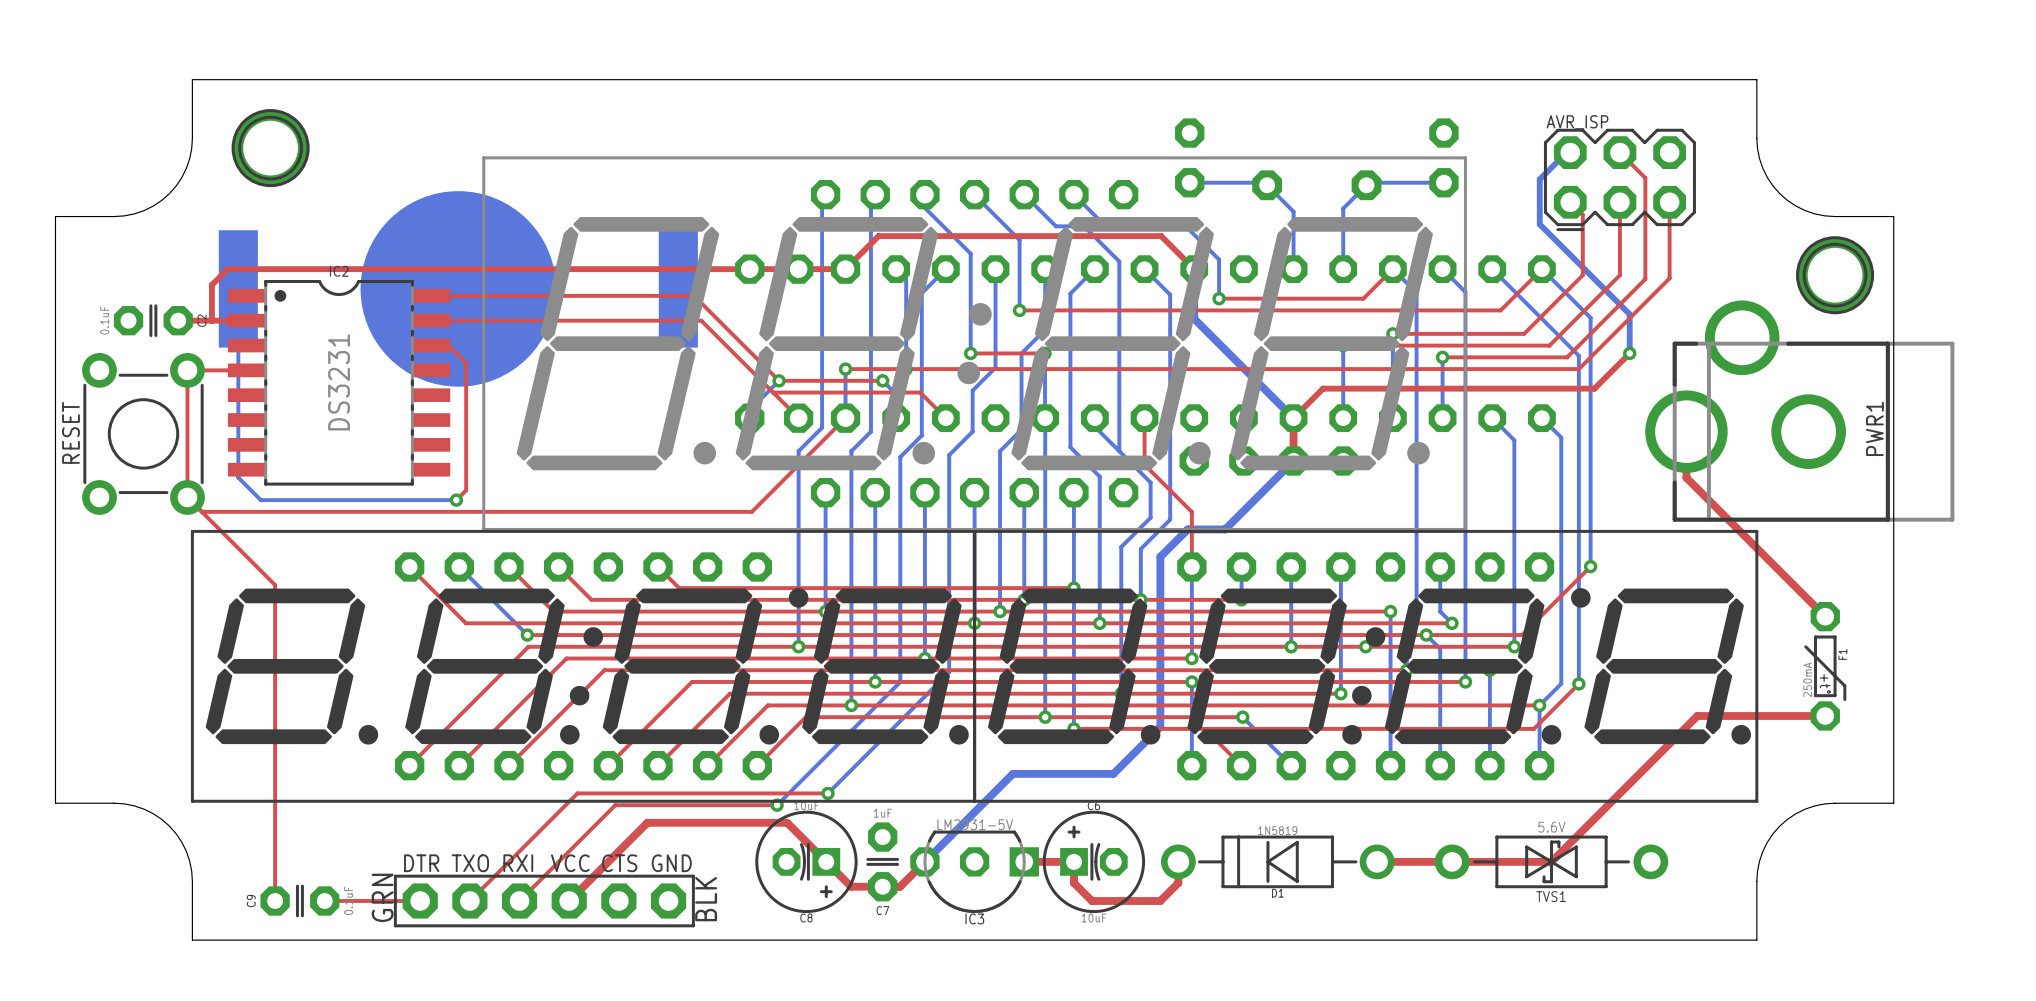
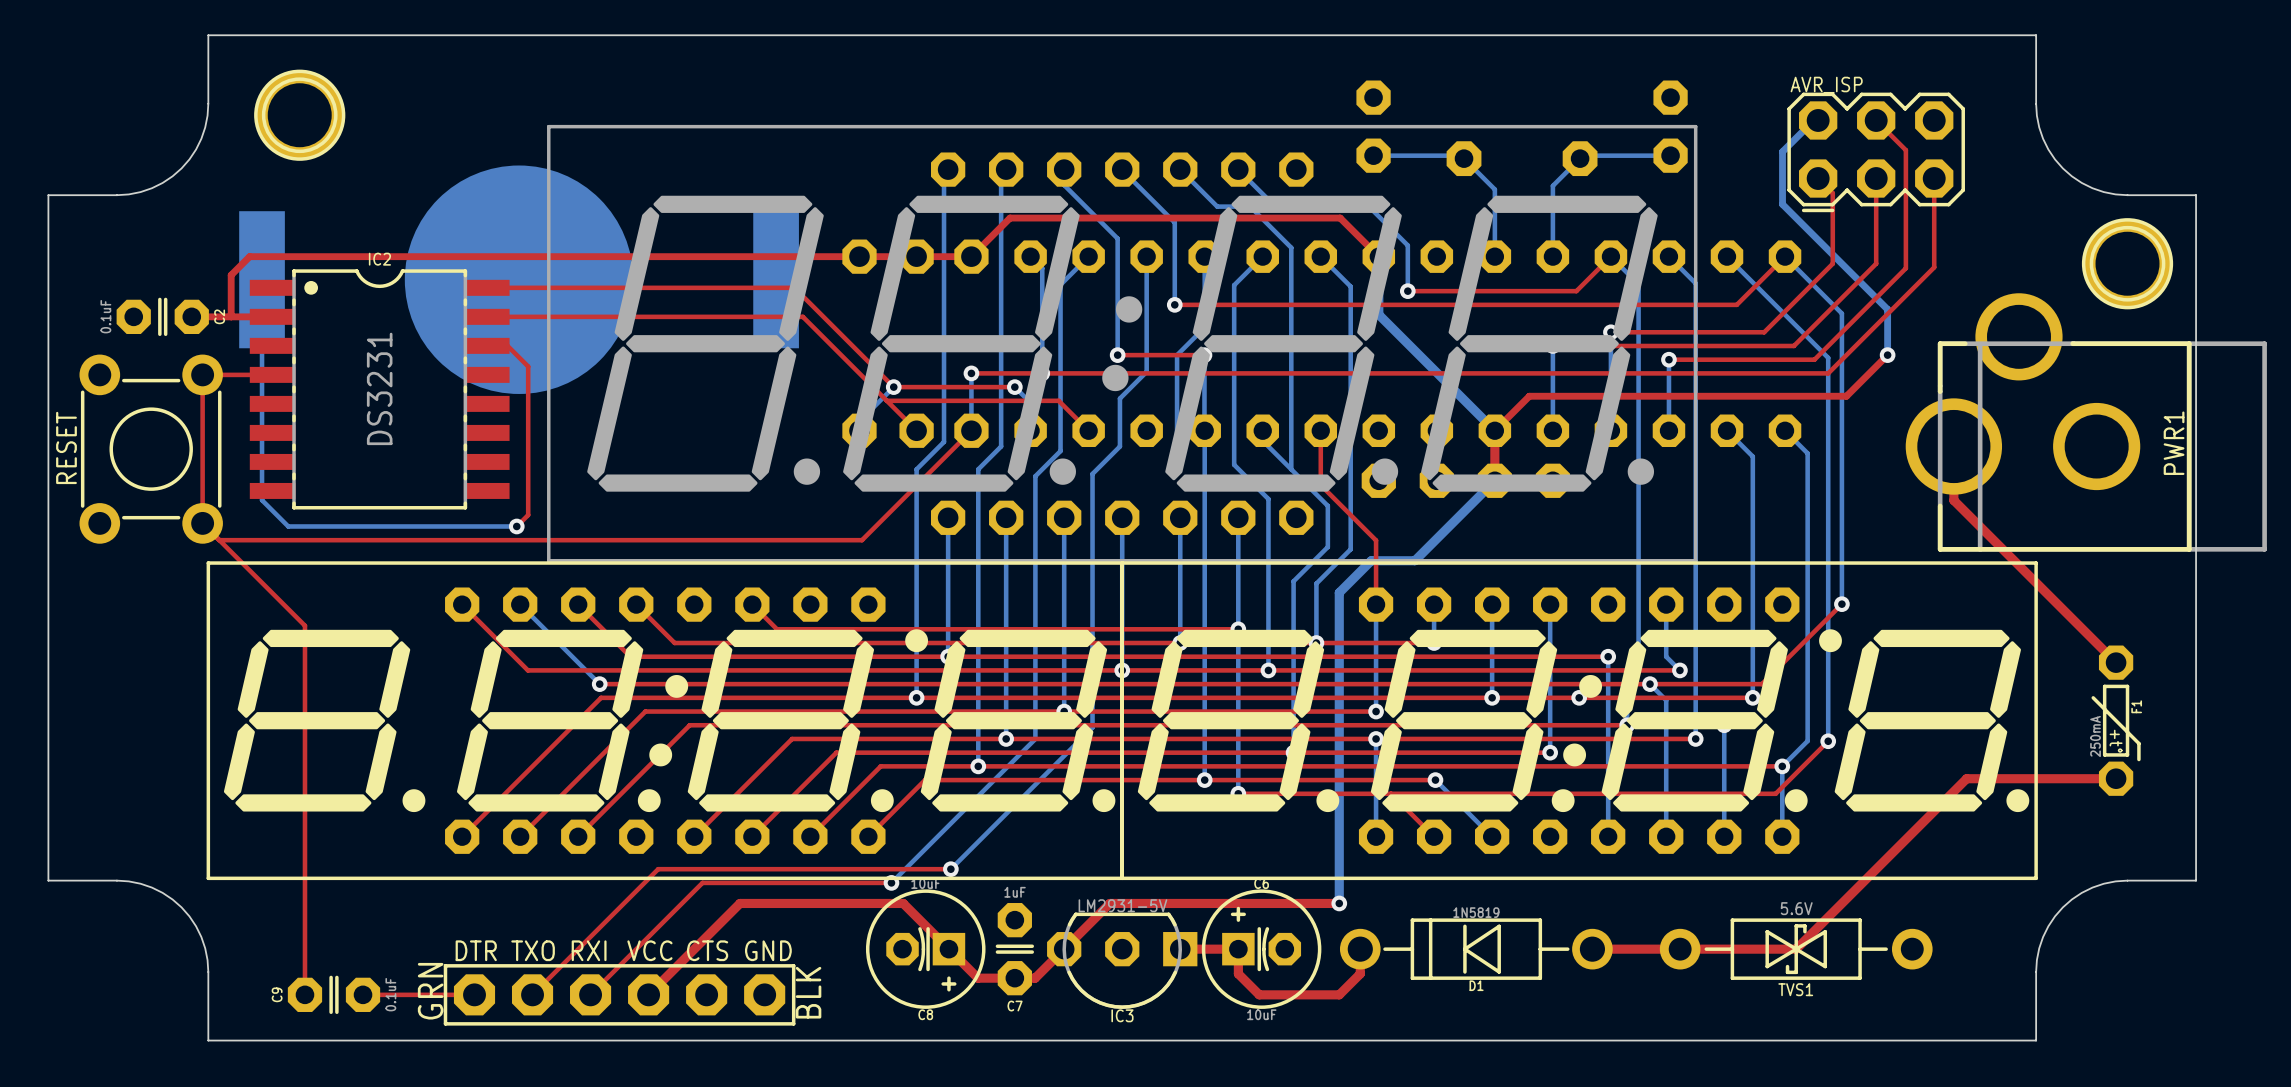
bottom track: (1021, 429) (1000, 451) (1000, 611) -> none
via: (1000, 611) -> none
bottom track: (1160, 726) (1113, 773) (1012, 773) (924, 861) -> (1339, 791) (1339, 903)
top track: none -> (1339, 903) (1109, 903) (1064, 949)
via: none -> (1339, 903)

